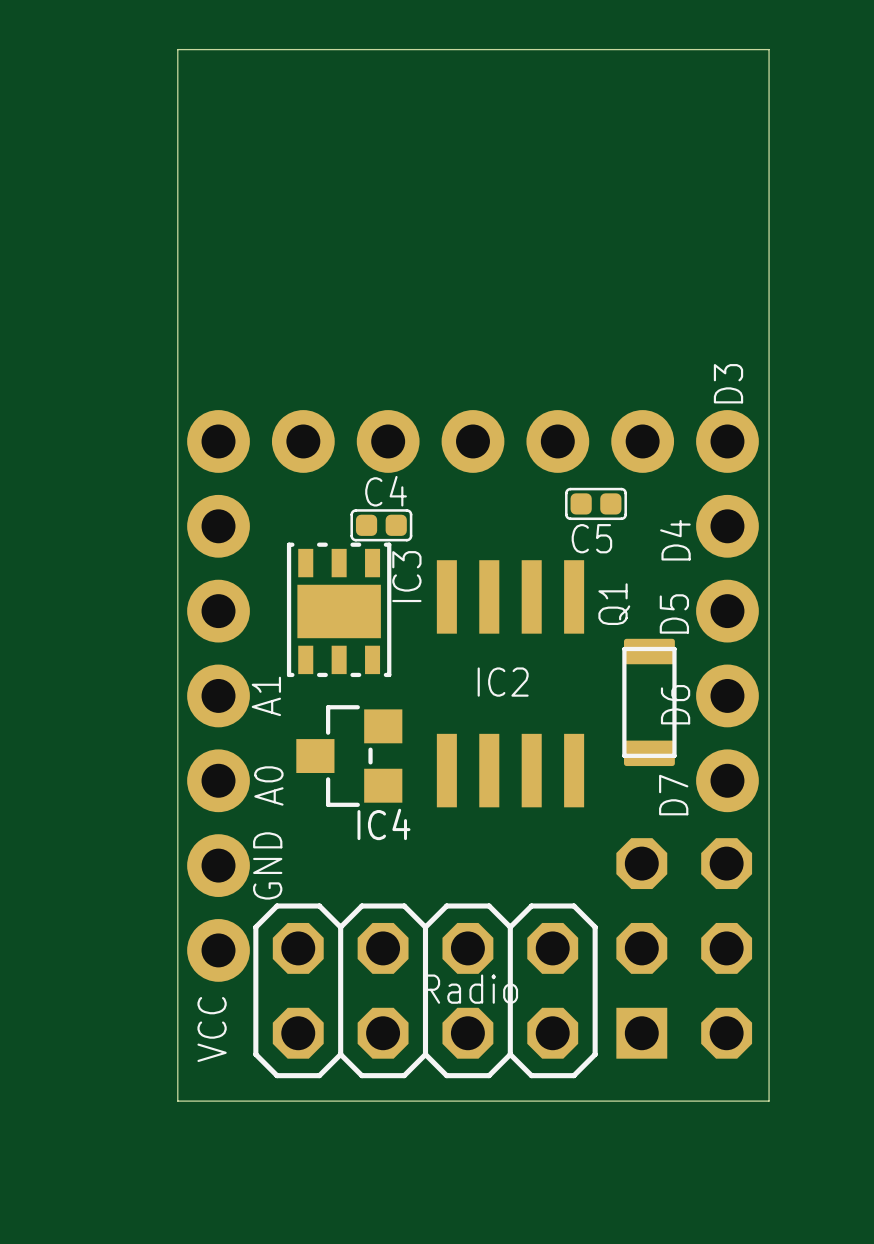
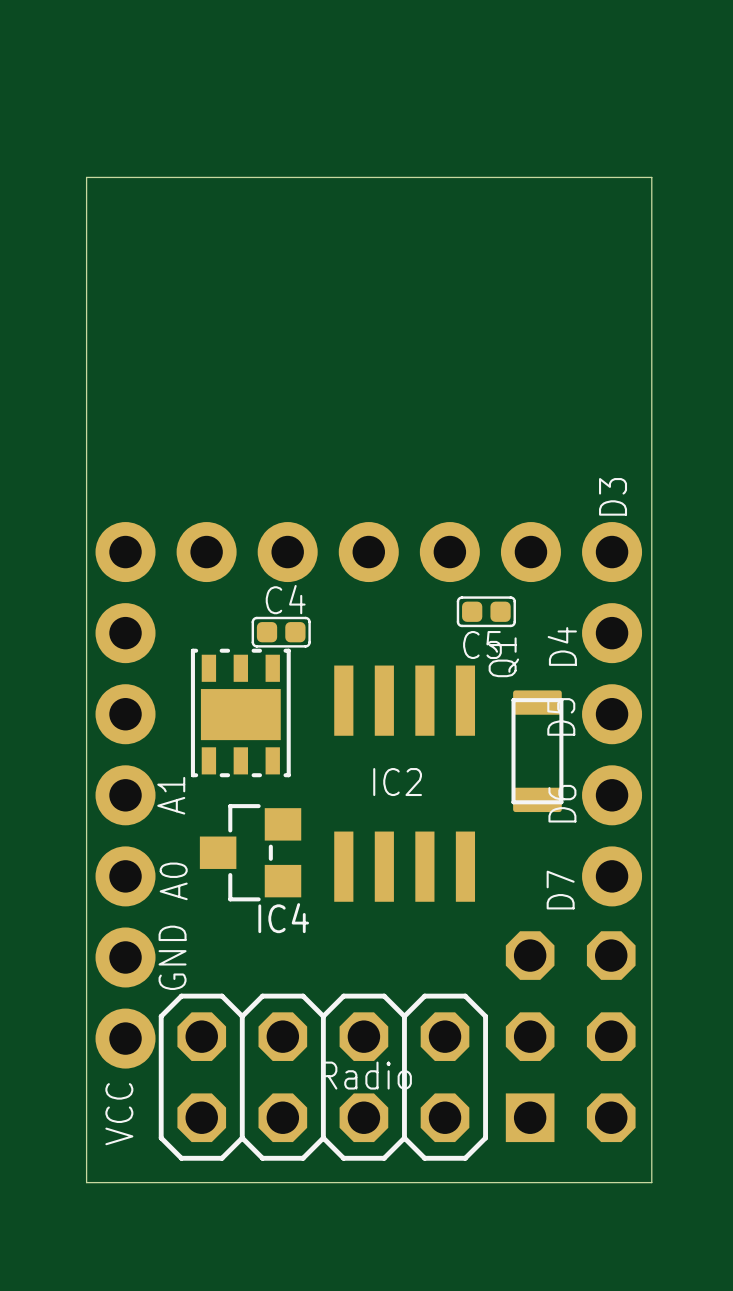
IC3 name: IC3 (406, 576) -> none
Q1 position: (649, 702) -> (537, 751)

